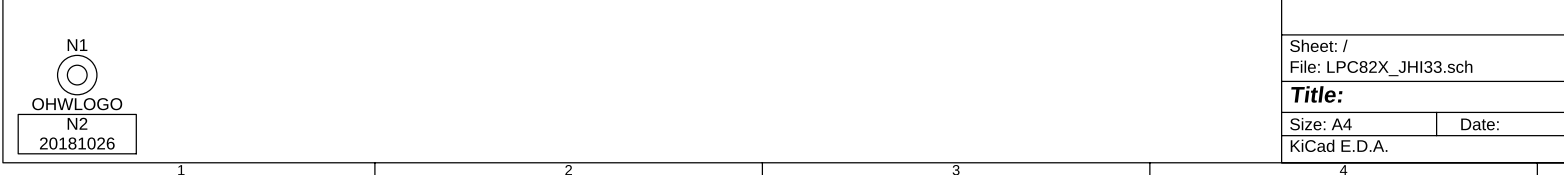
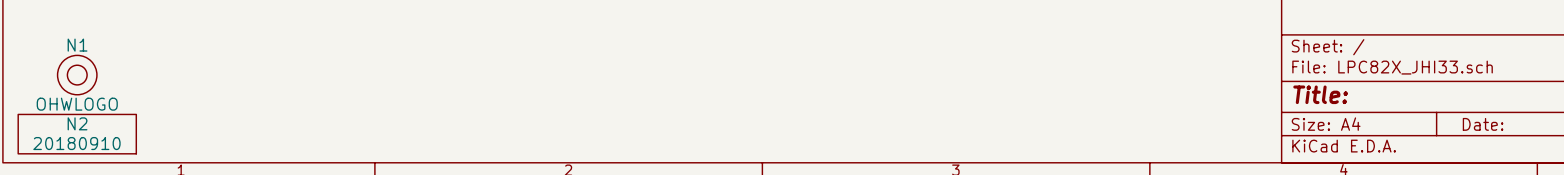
N2 value: 20181026 (77, 143) -> 20180910 (76, 143)

